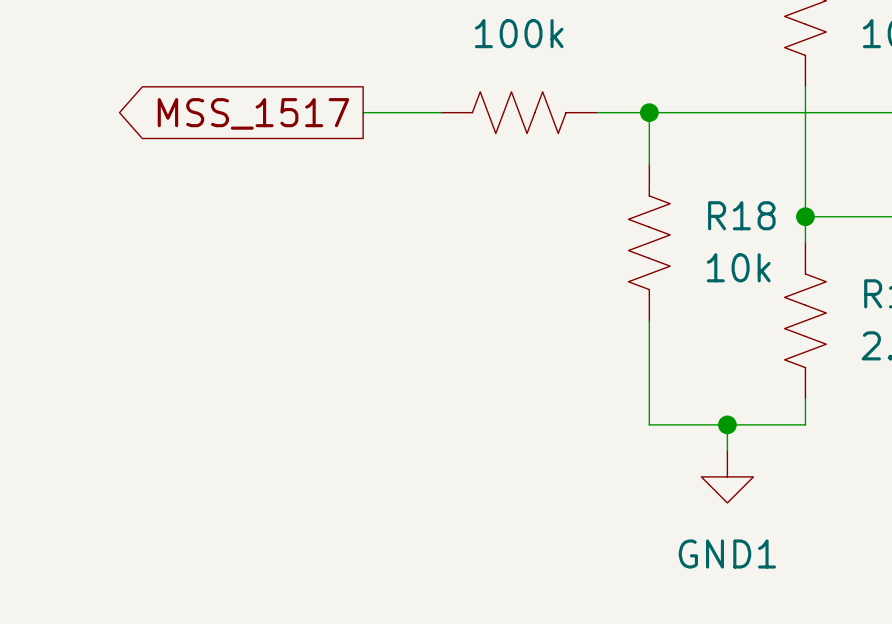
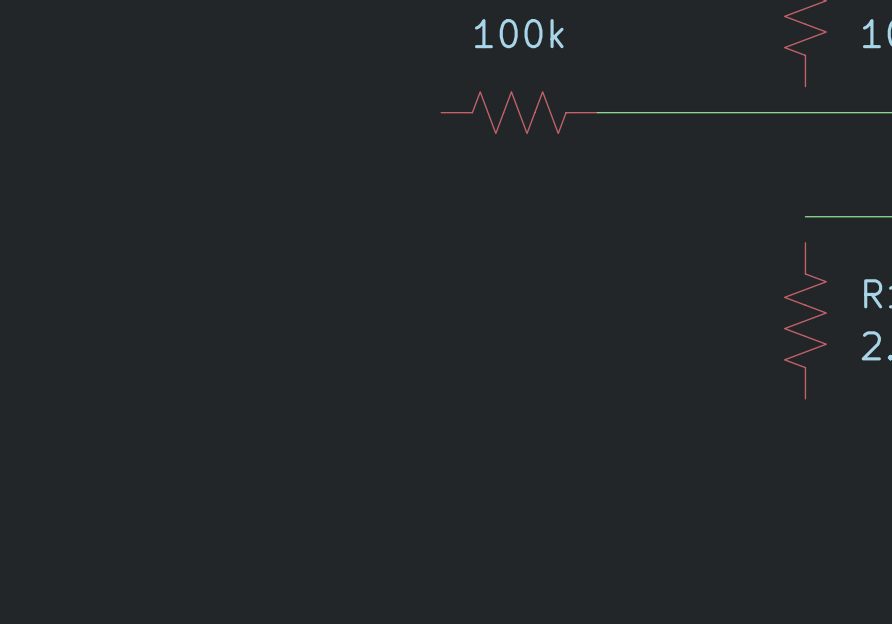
wire: (805, 86) (805, 242) -> none
wire: (363, 112) (441, 112) -> none
wire: (649, 112) (649, 164) -> none
junction: (649, 112) -> none
global label: MSS_1517 (253, 113) -> none
junction: (805, 216) -> none
R18: 10k (649, 242) -> none
wire: (649, 320) (649, 424) (805, 424) (805, 398) -> none
wire: (727, 424) (727, 450) -> none
junction: (727, 424) -> none
power symbol: GND1 (727, 476) -> none

